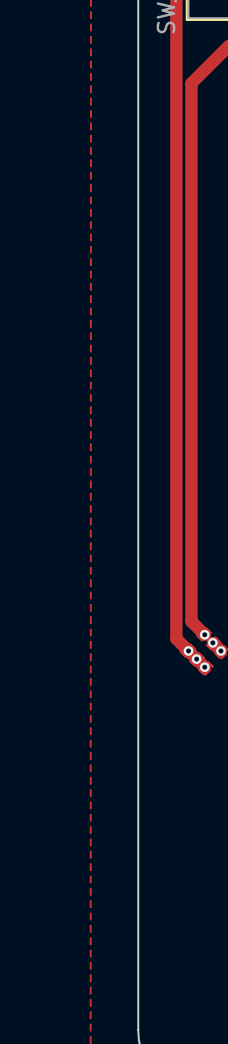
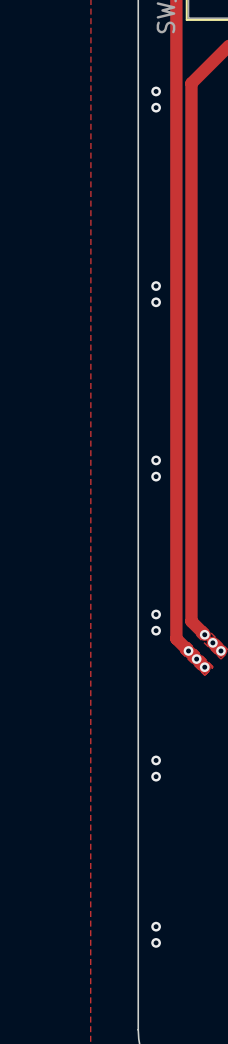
via: none -> (156, 91)
via: none -> (156, 107)
via: none -> (156, 286)
via: none -> (156, 302)
via: none -> (156, 460)
via: none -> (156, 476)
via: none -> (156, 614)
via: none -> (156, 630)
via: none -> (156, 760)
via: none -> (156, 776)
via: none -> (156, 926)
via: none -> (156, 942)

